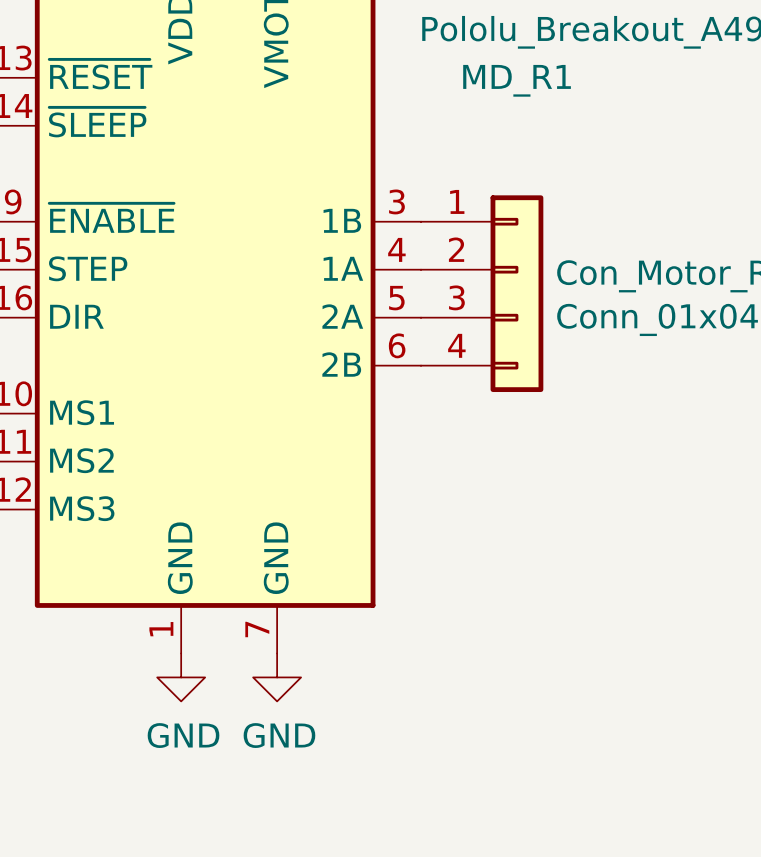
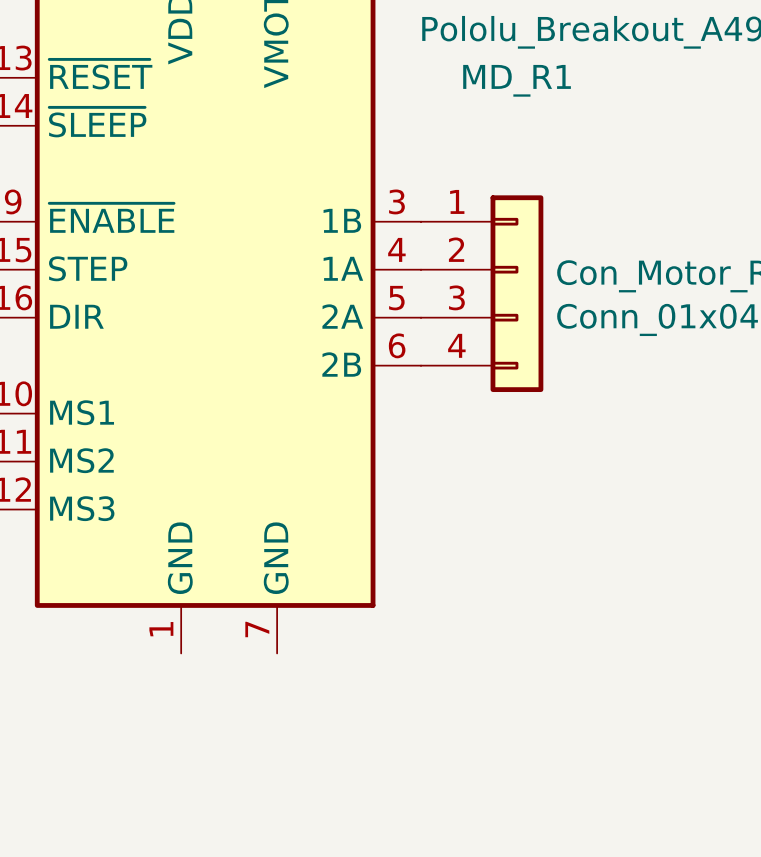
power symbol: GND (181, 677) -> none
power symbol: GND (277, 677) -> none

